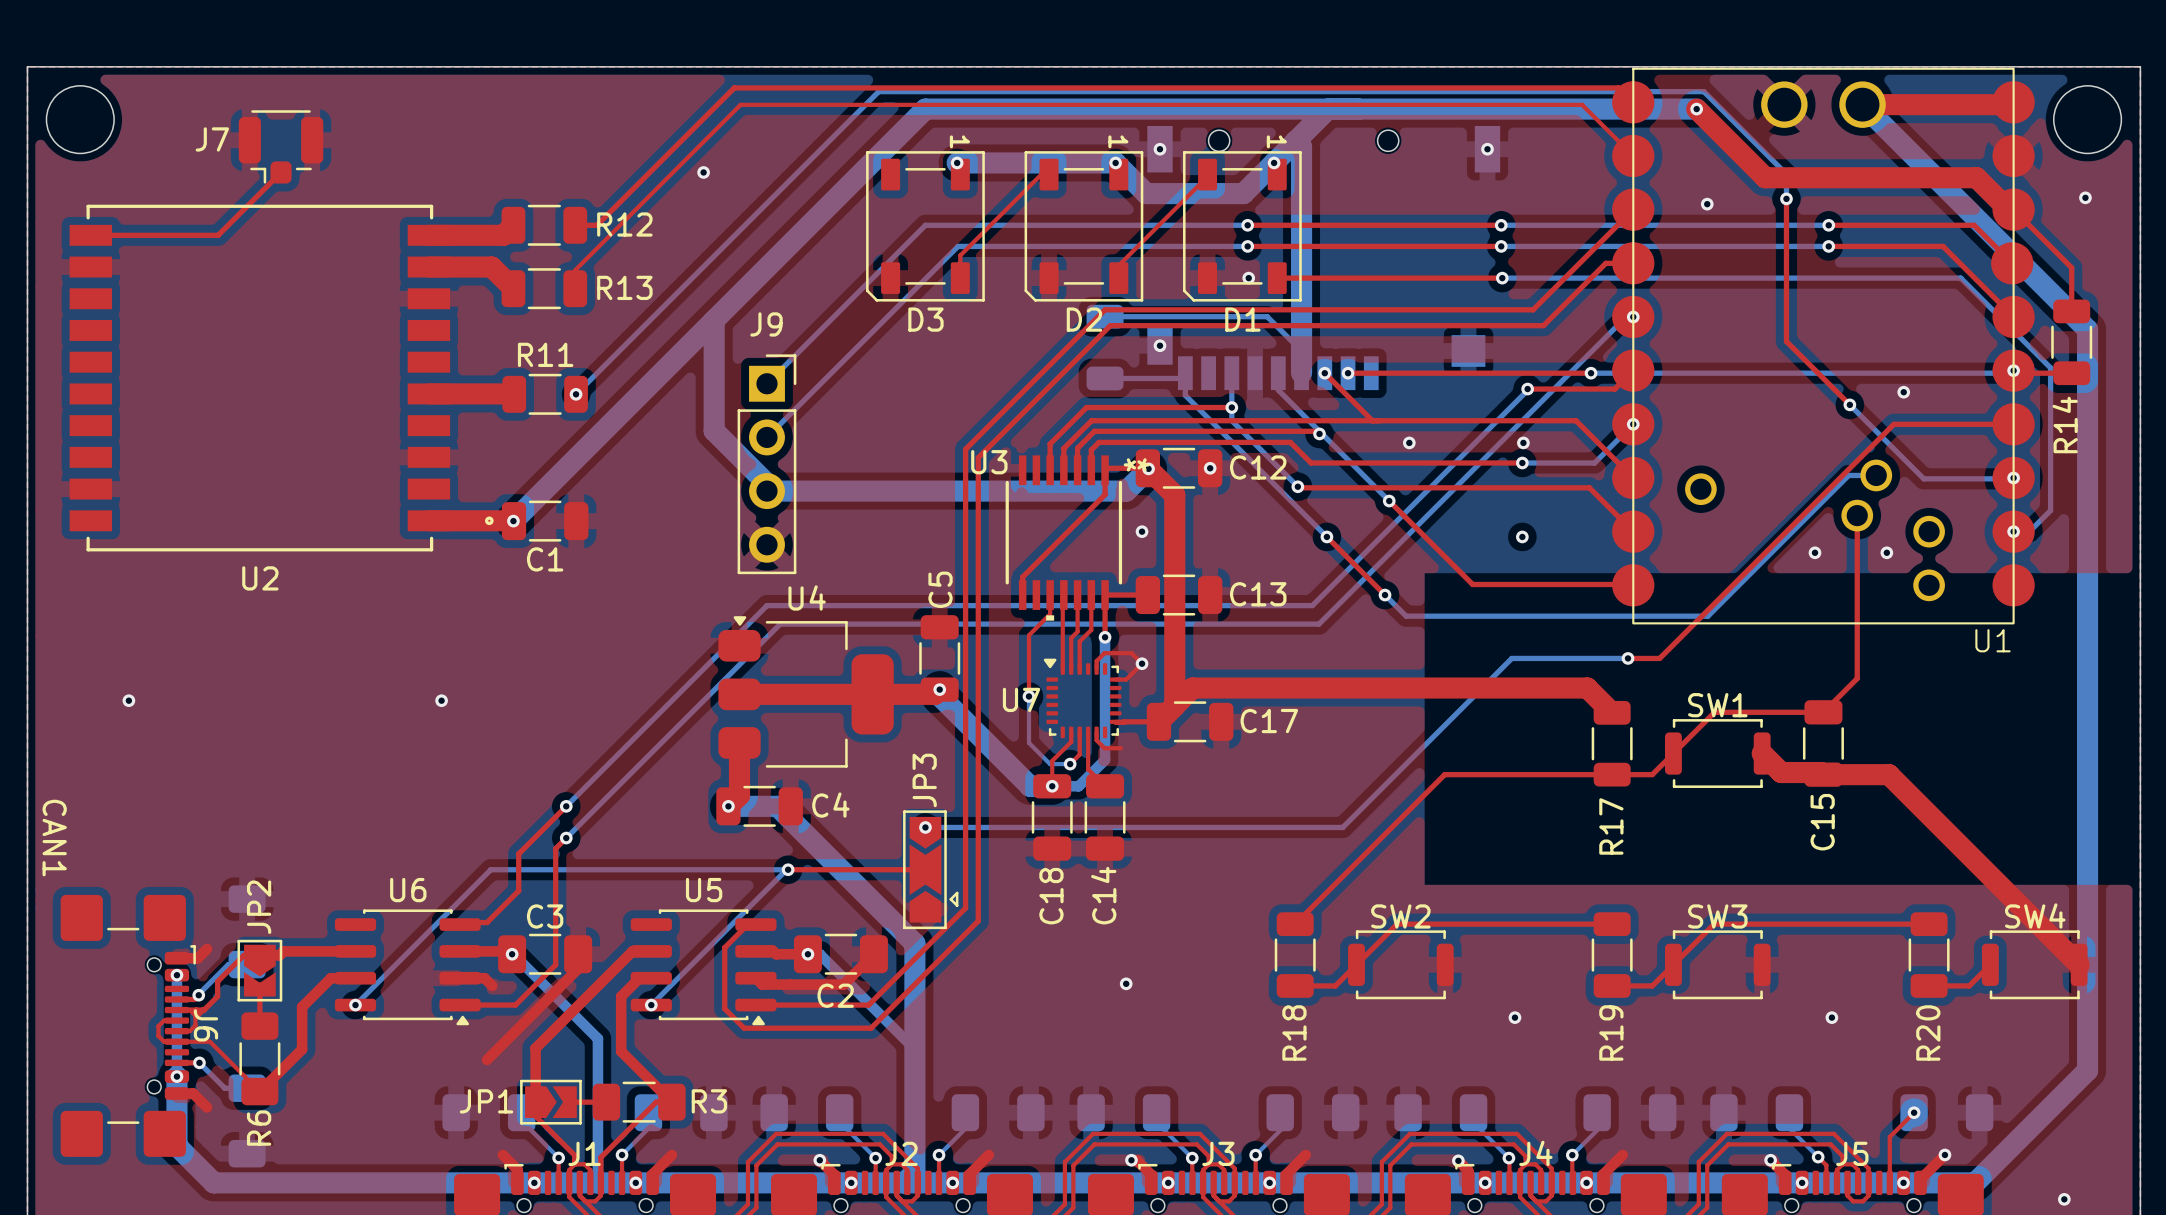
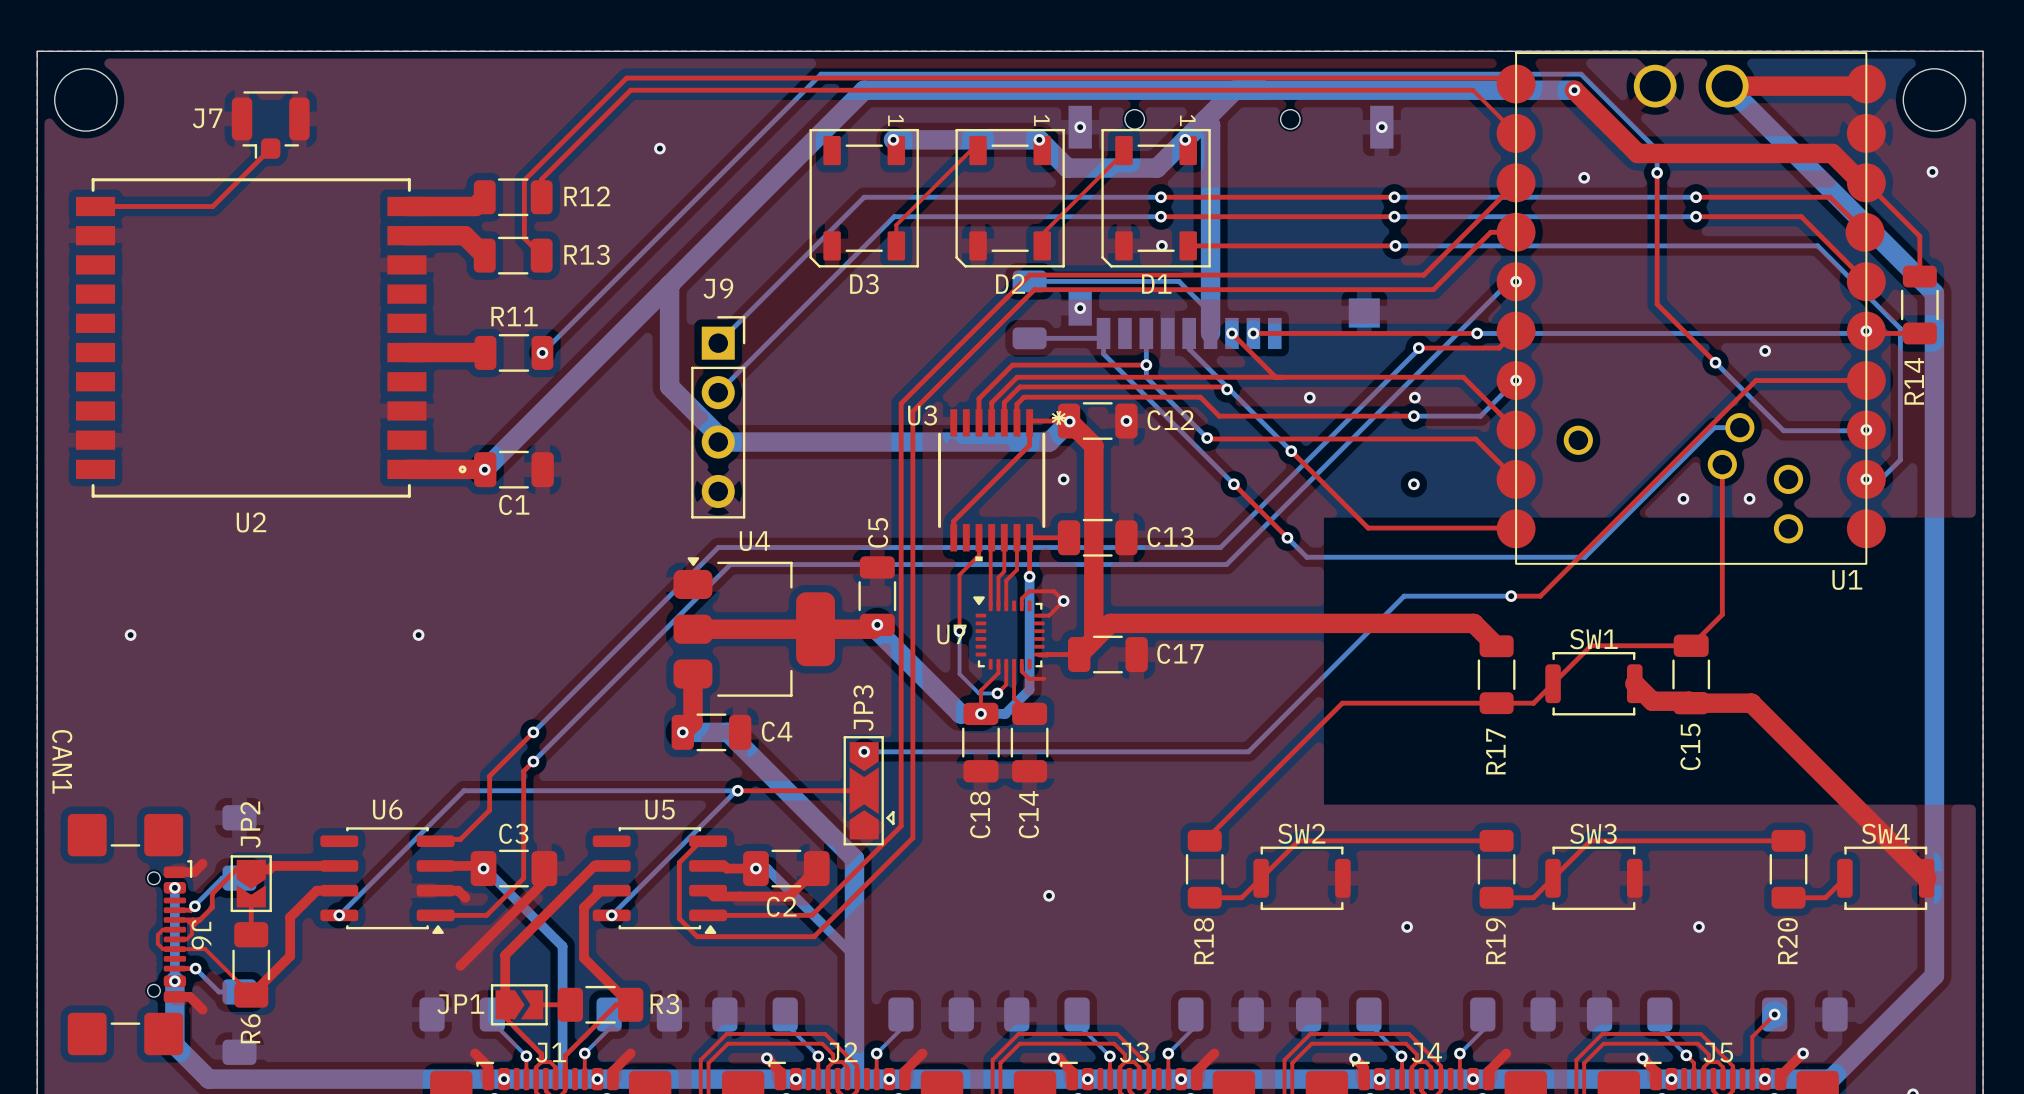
top track: (1633, 102) (1618, 87) (734, 87) (596, 225) (575, 225) -> (1472, 90) (630, 90) (541, 179) (541, 197)
top track: (1586, 109) (1582, 104) (740, 104) (575, 270) (575, 288) -> (1510, 78) (626, 78) (524, 180) (524, 238) (541, 255)

